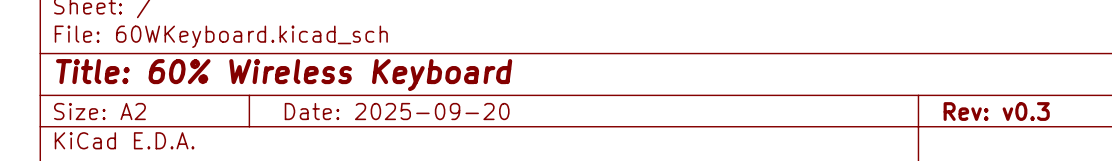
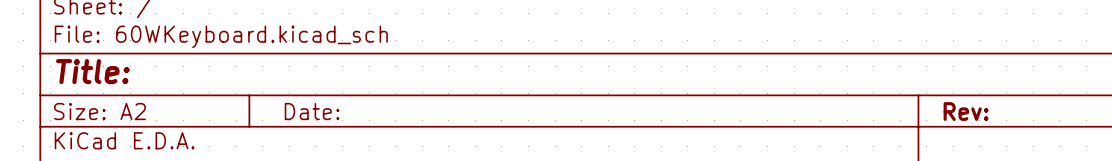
title block: Title: 60% Wireless Keyboard (284, 75) -> Title: (92, 71)
title block: Date: 2025-09-20 (397, 111) -> Date: (312, 111)
title block: Rev: v0.3 (996, 111) -> Rev: (966, 111)

